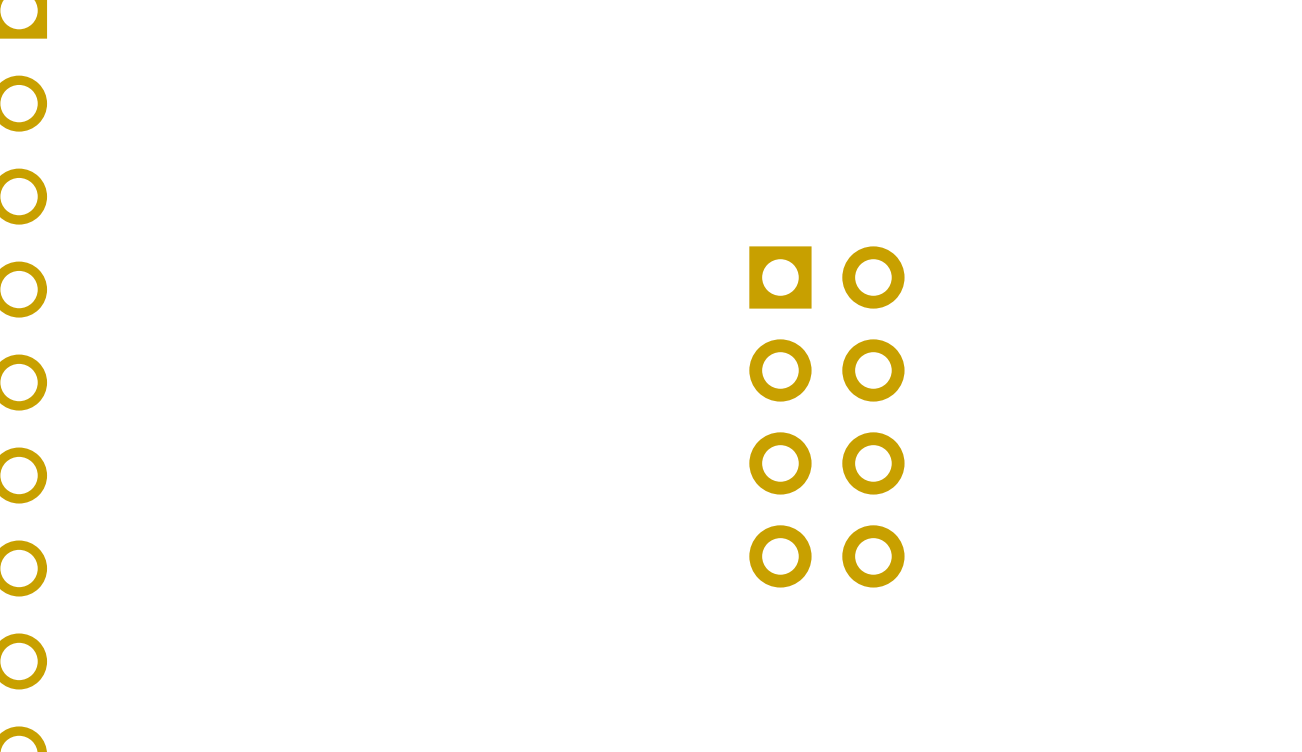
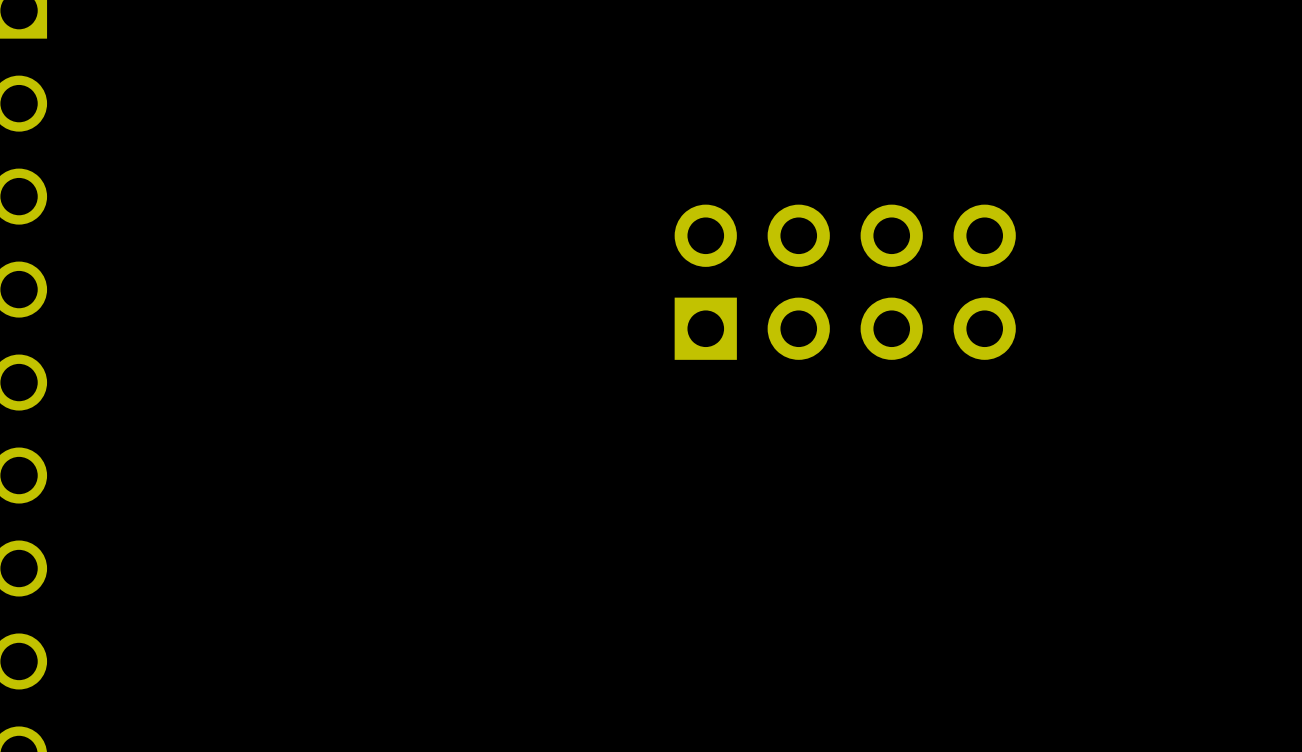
part rotation: 0° (826, 416) -> 90° counterclockwise (845, 282)

